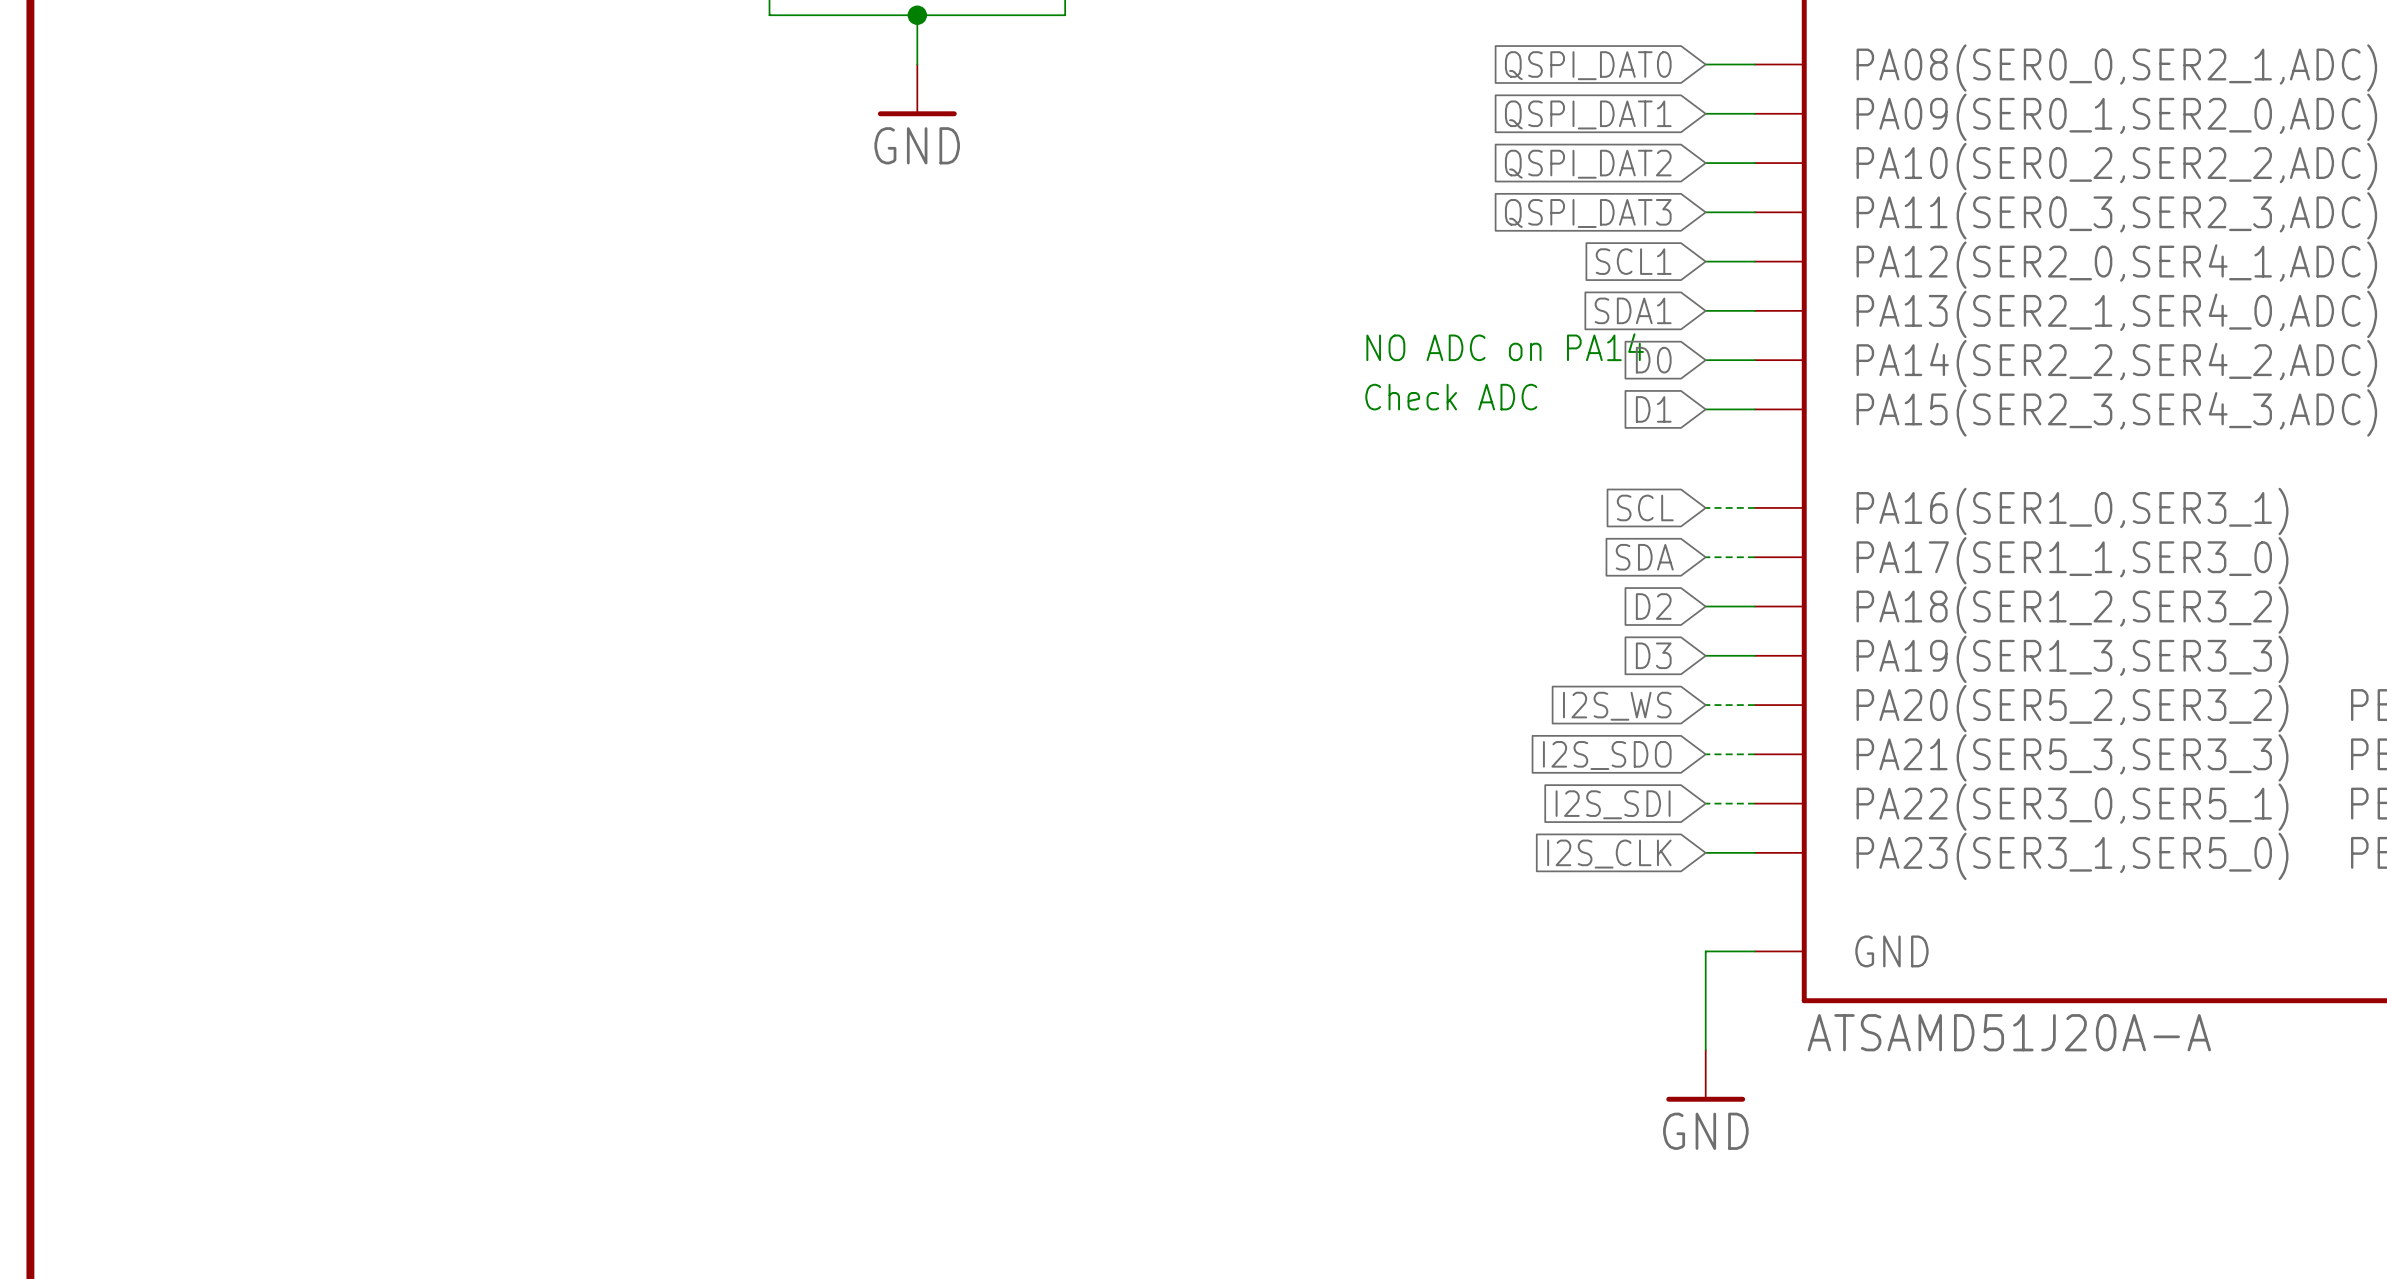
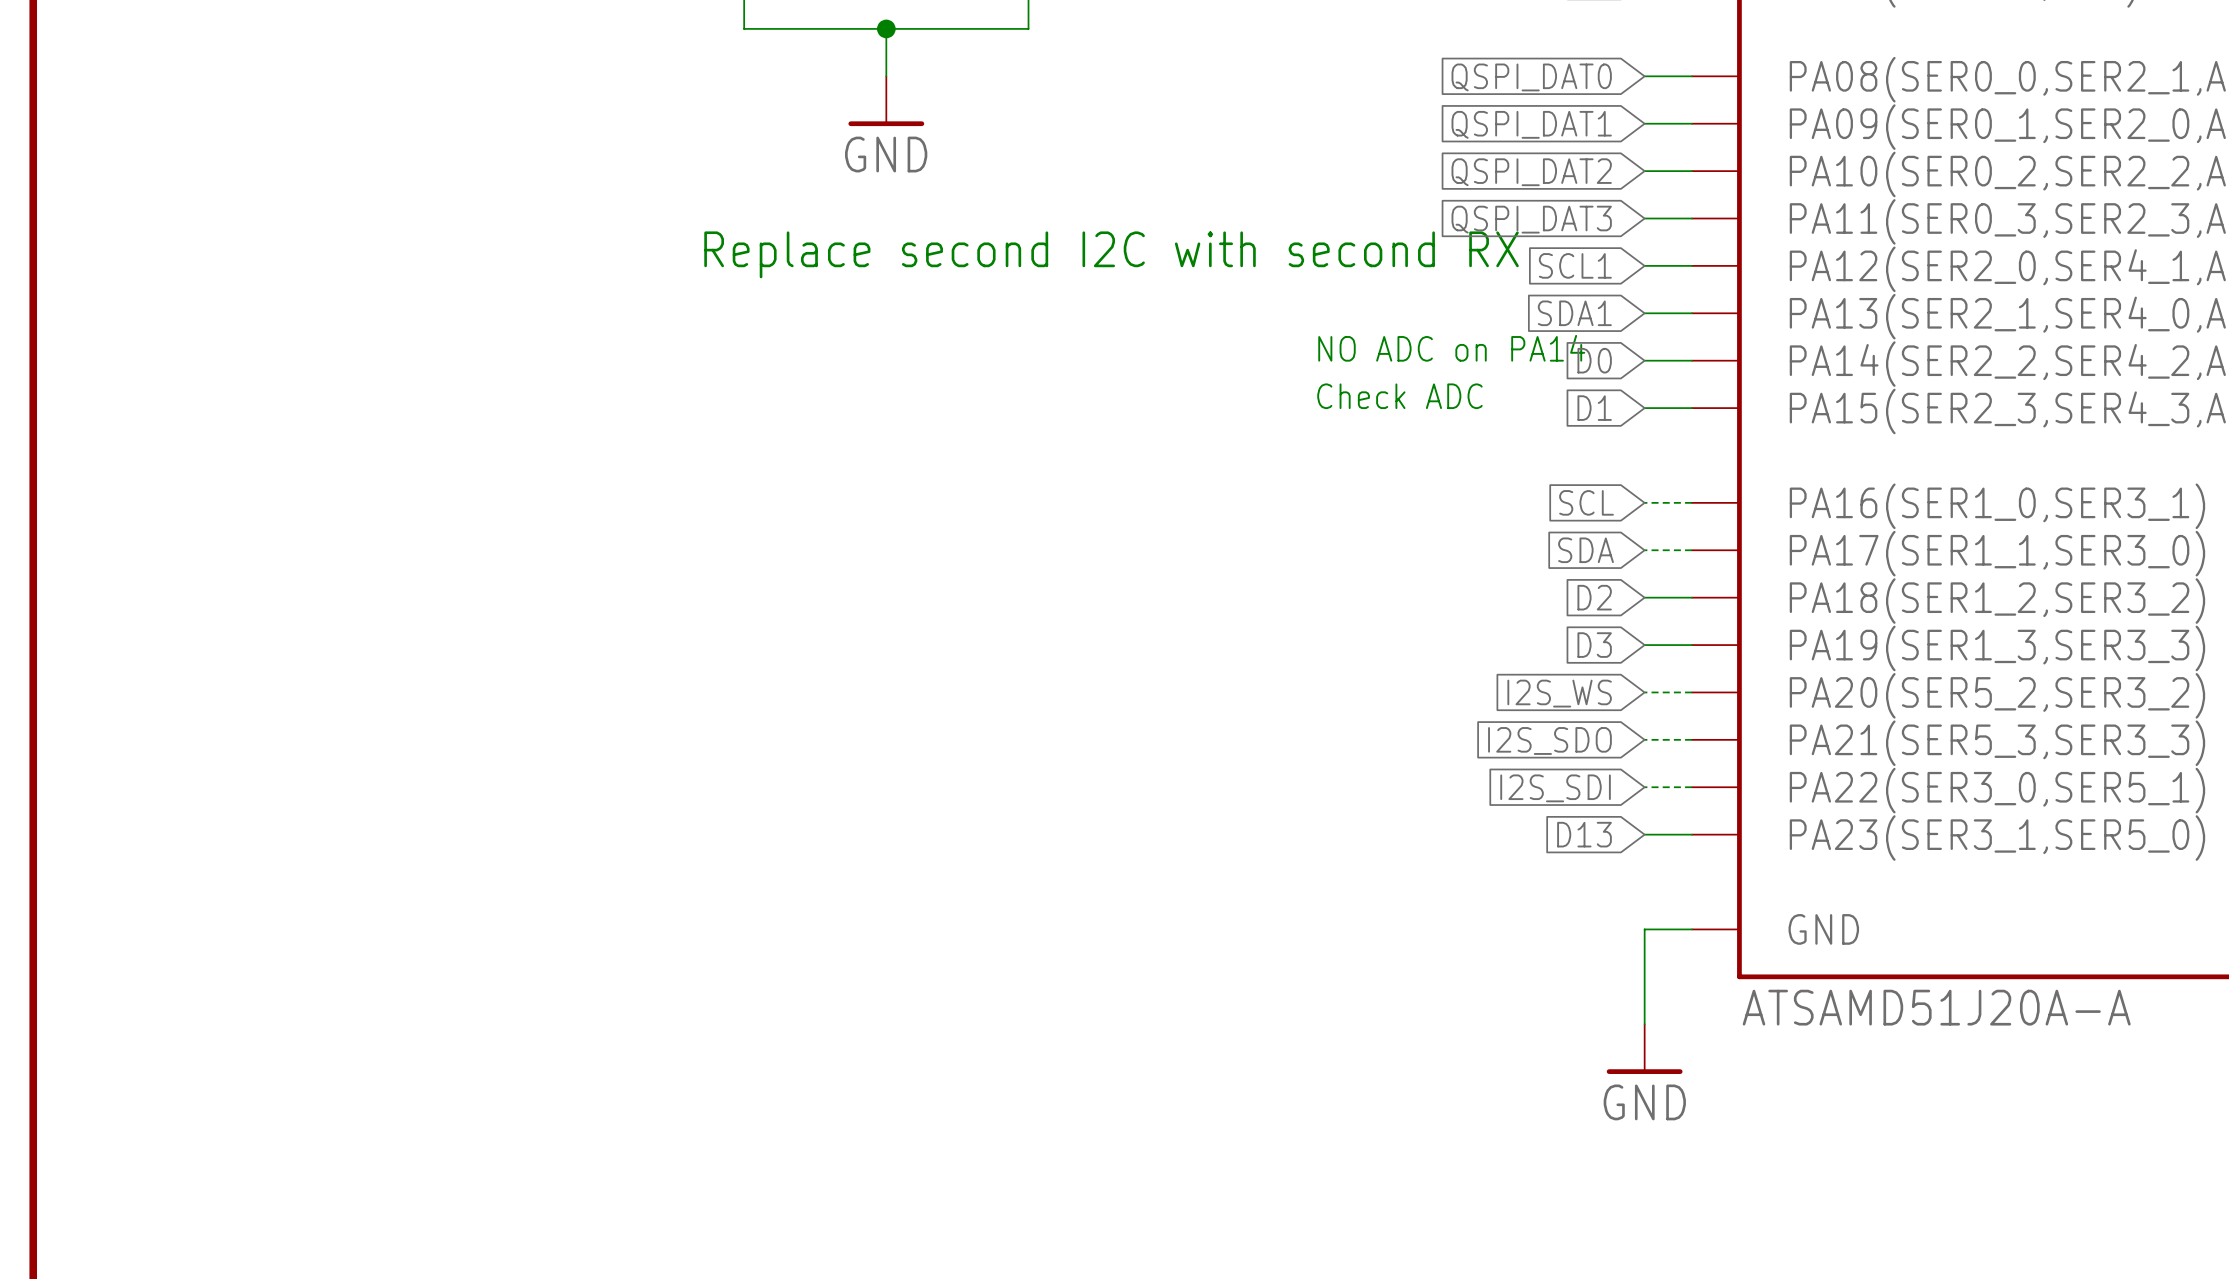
text: none -> Replace second I2C with second RX (1111, 254)
global label: I2S_CLK (1609, 854) -> D13 (1584, 834)

